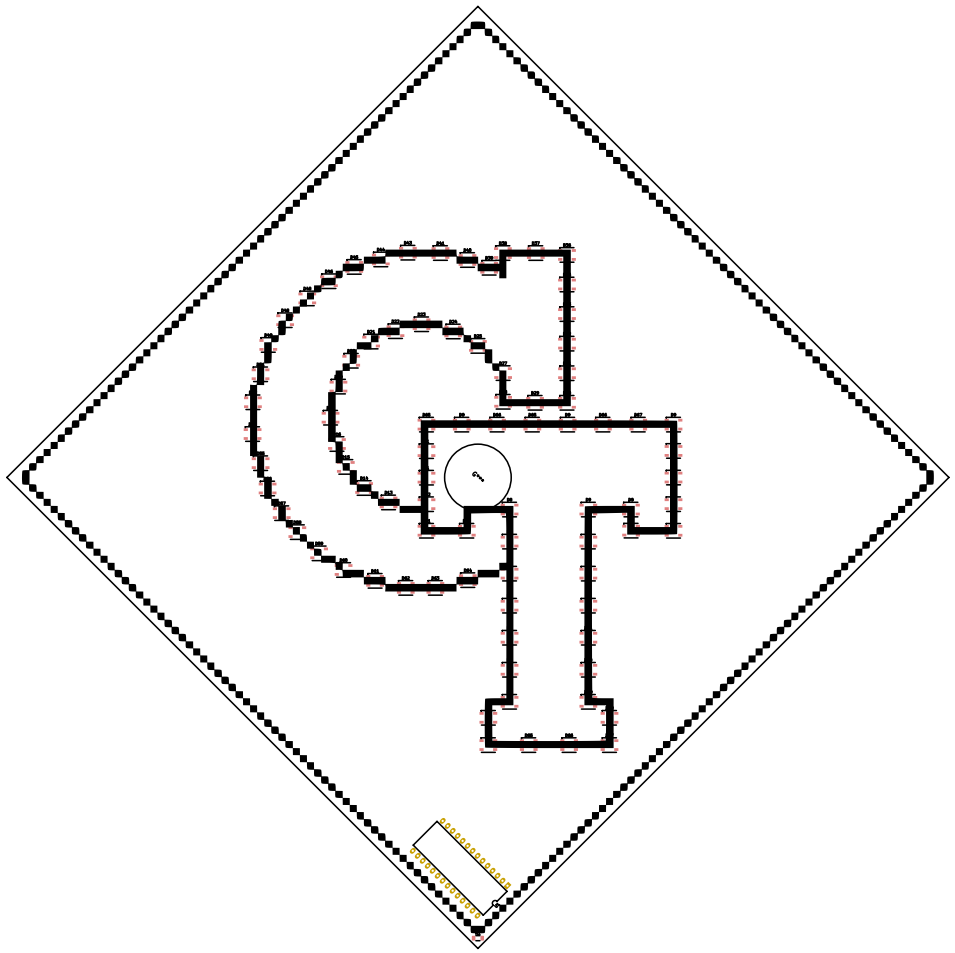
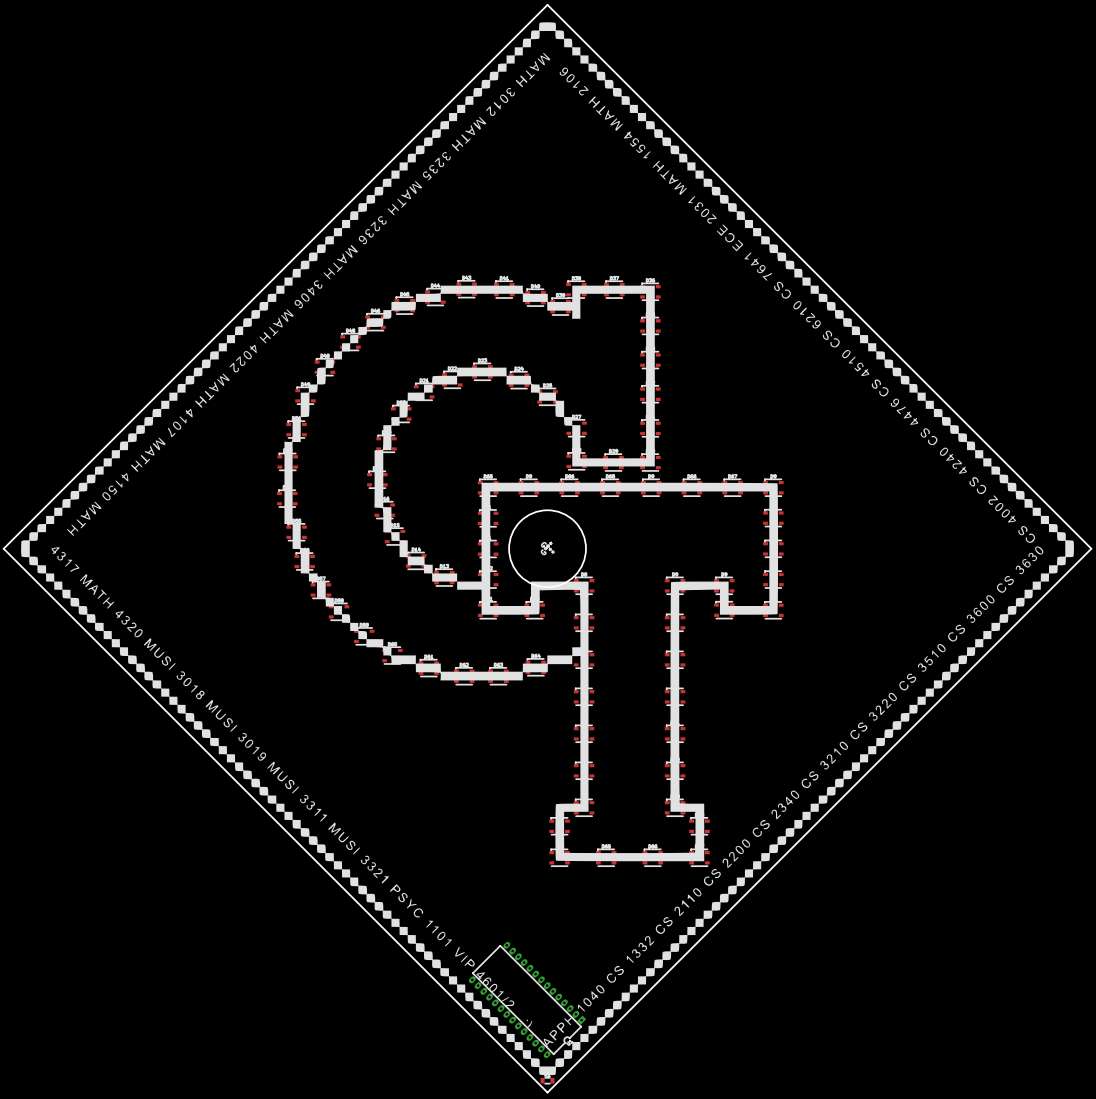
part: none -> (547, 550)

